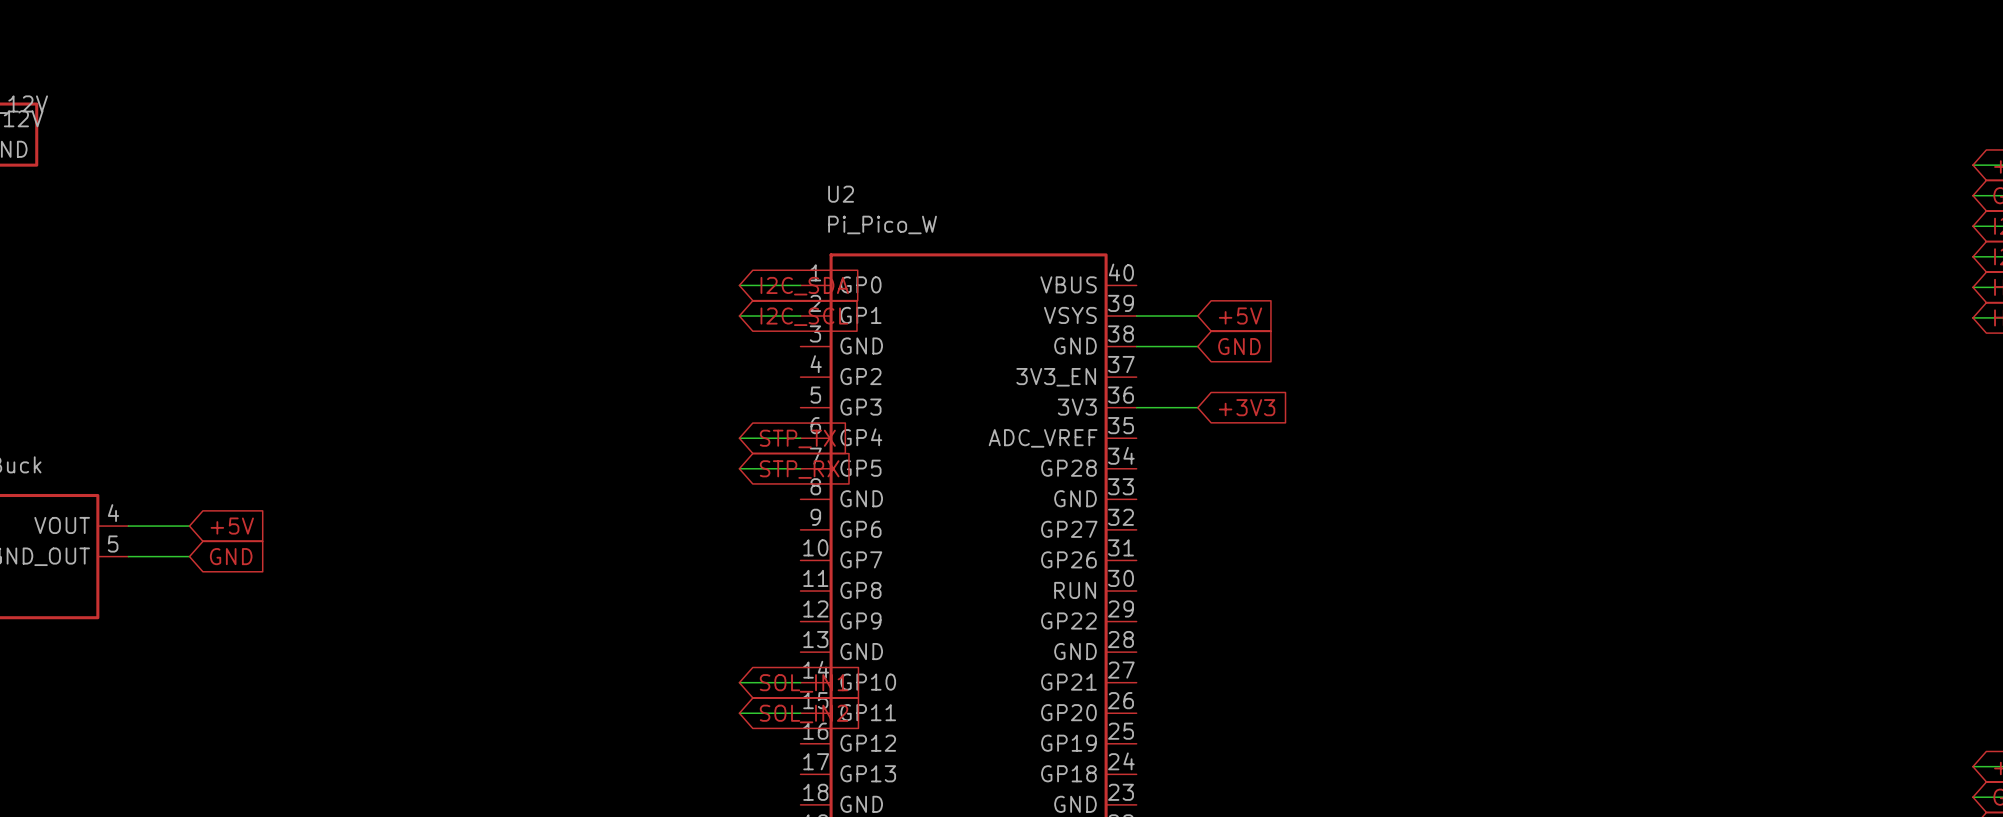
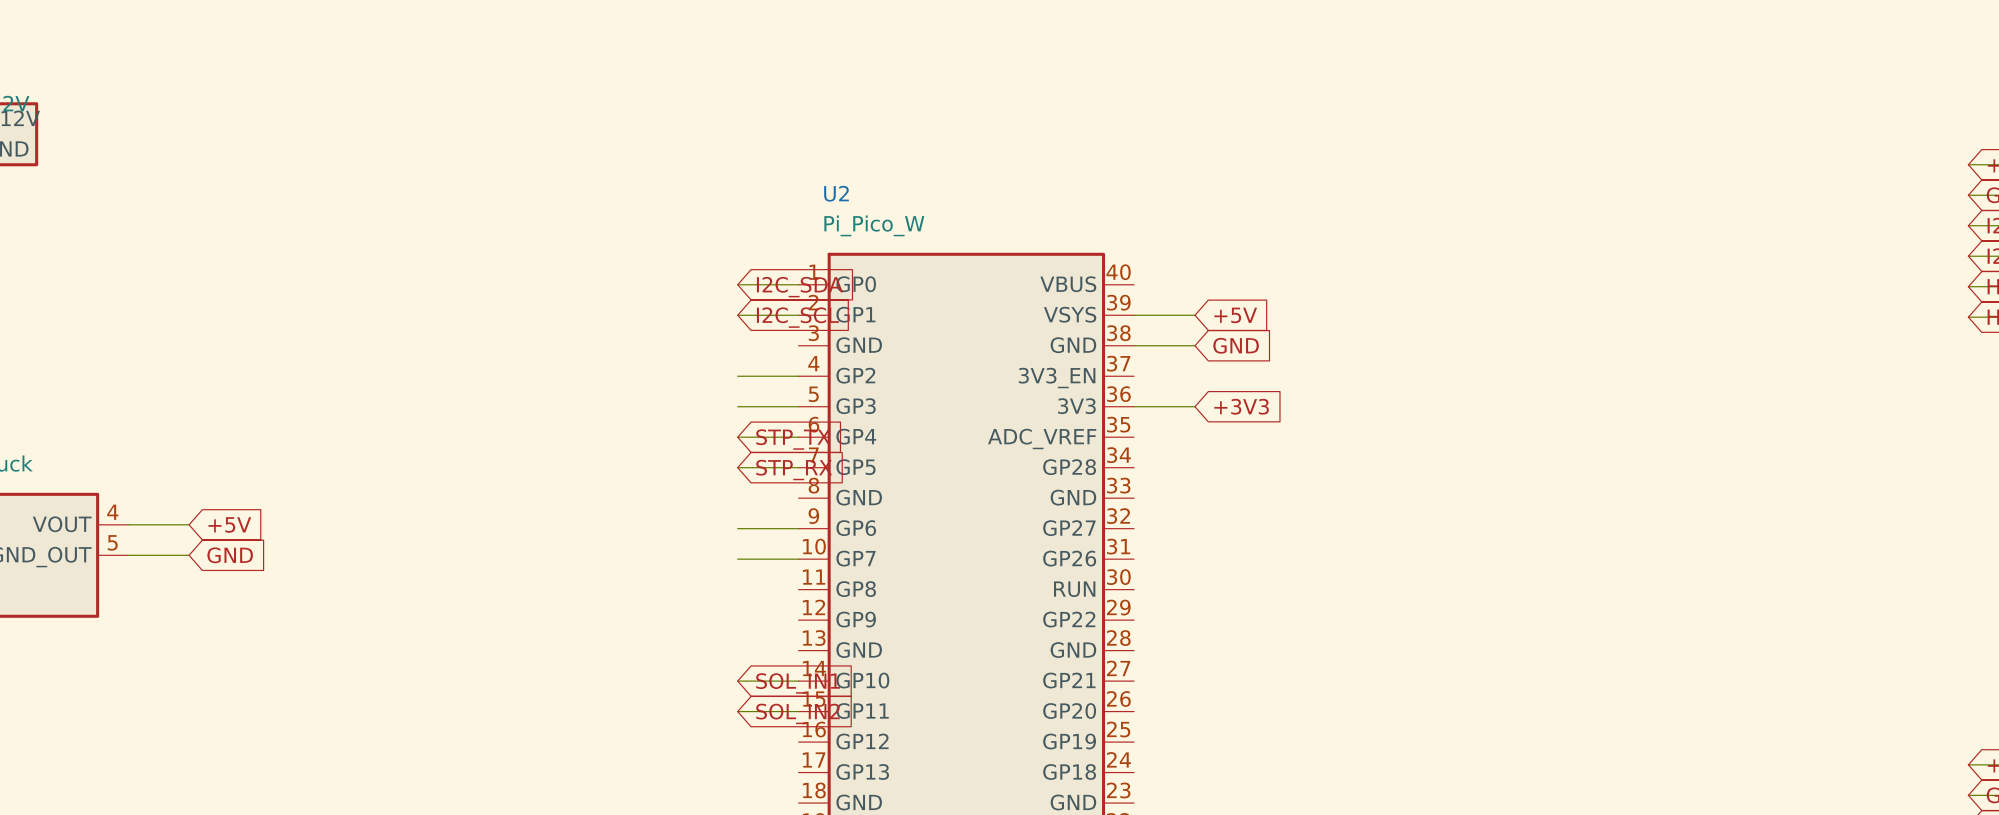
wire: none -> (737, 376) (798, 376)
wire: none -> (737, 406) (798, 406)
wire: none -> (737, 528) (798, 528)
wire: none -> (737, 559) (798, 559)

